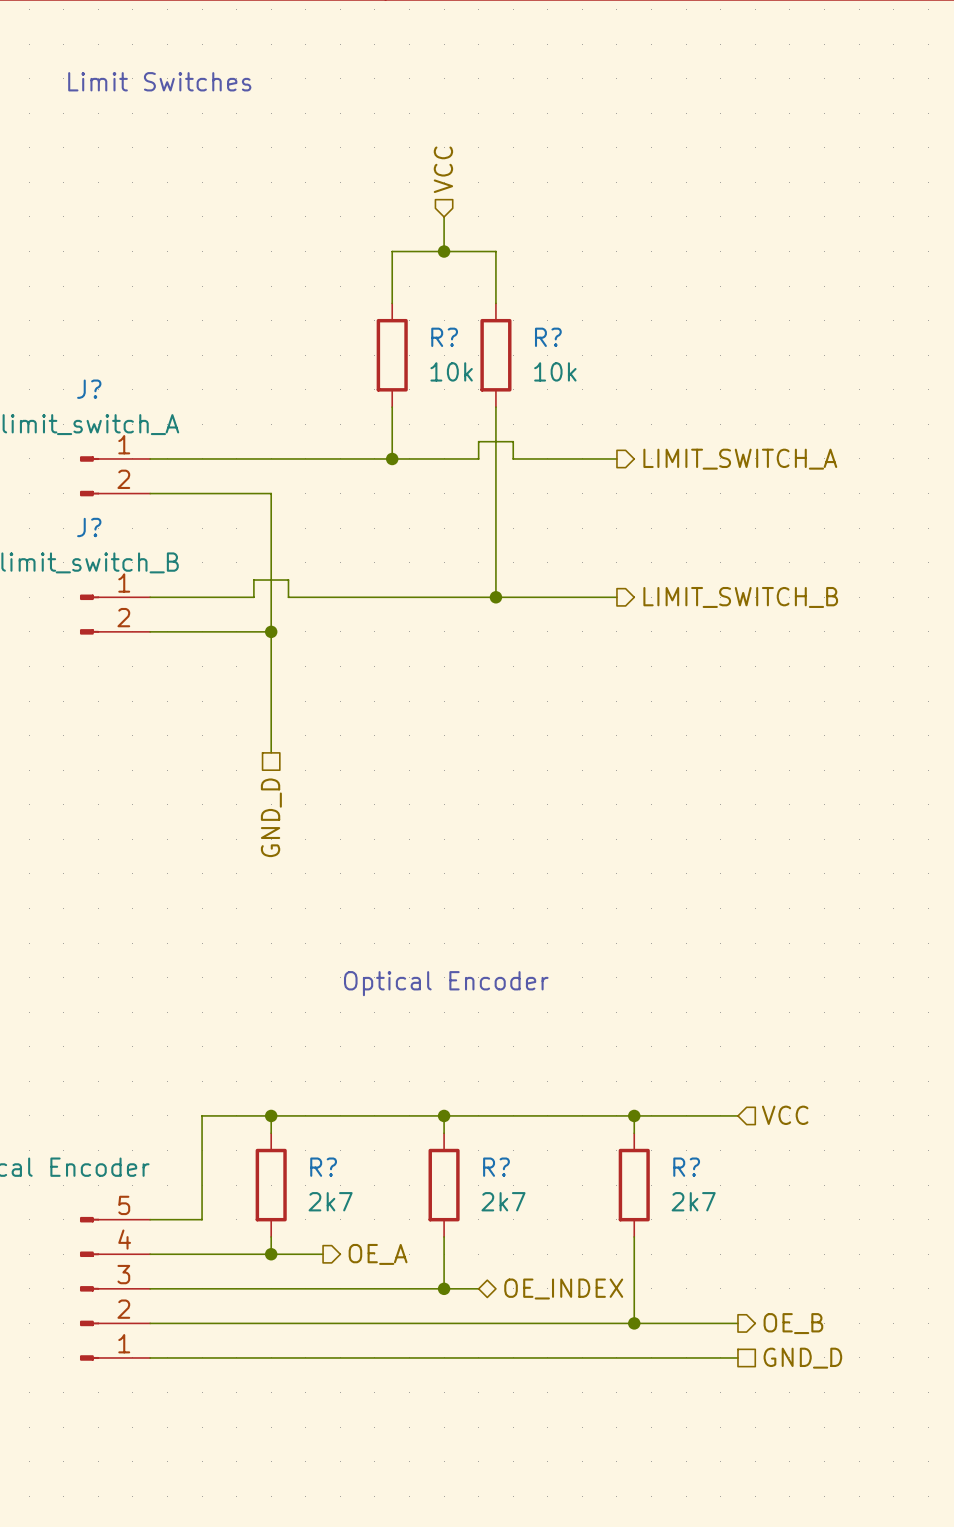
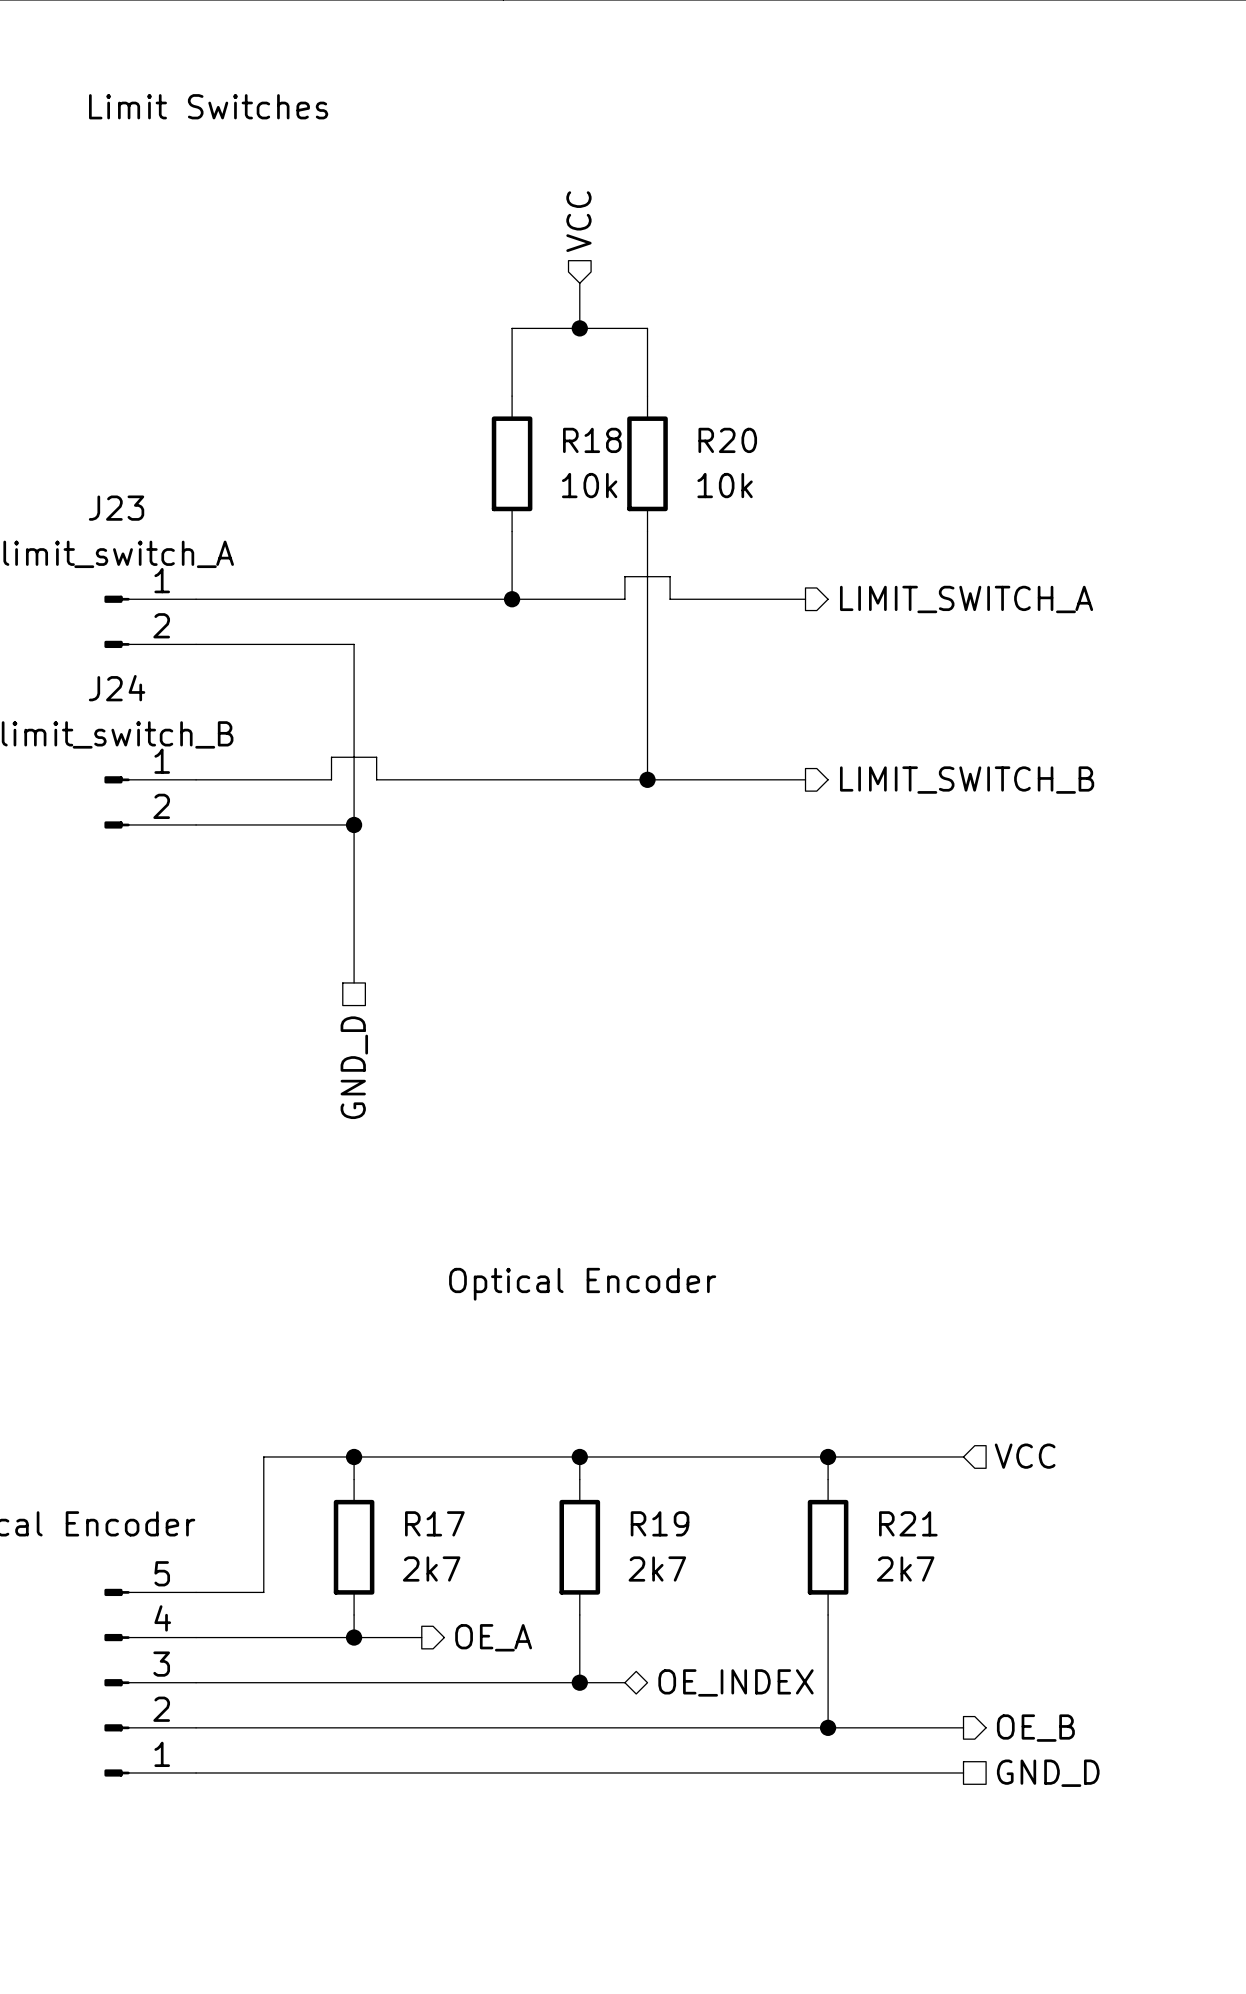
R? name: R? (444, 337) -> R18 (592, 440)
R? name: R? (548, 337) -> R20 (727, 440)
J? name: J? (89, 389) -> J23 (116, 508)
J? name: J? (89, 527) -> J24 (117, 688)
R? name: R? (323, 1167) -> R17 (434, 1523)
R? name: R? (496, 1167) -> R19 (660, 1523)
R? name: R? (686, 1167) -> R21 (908, 1523)

